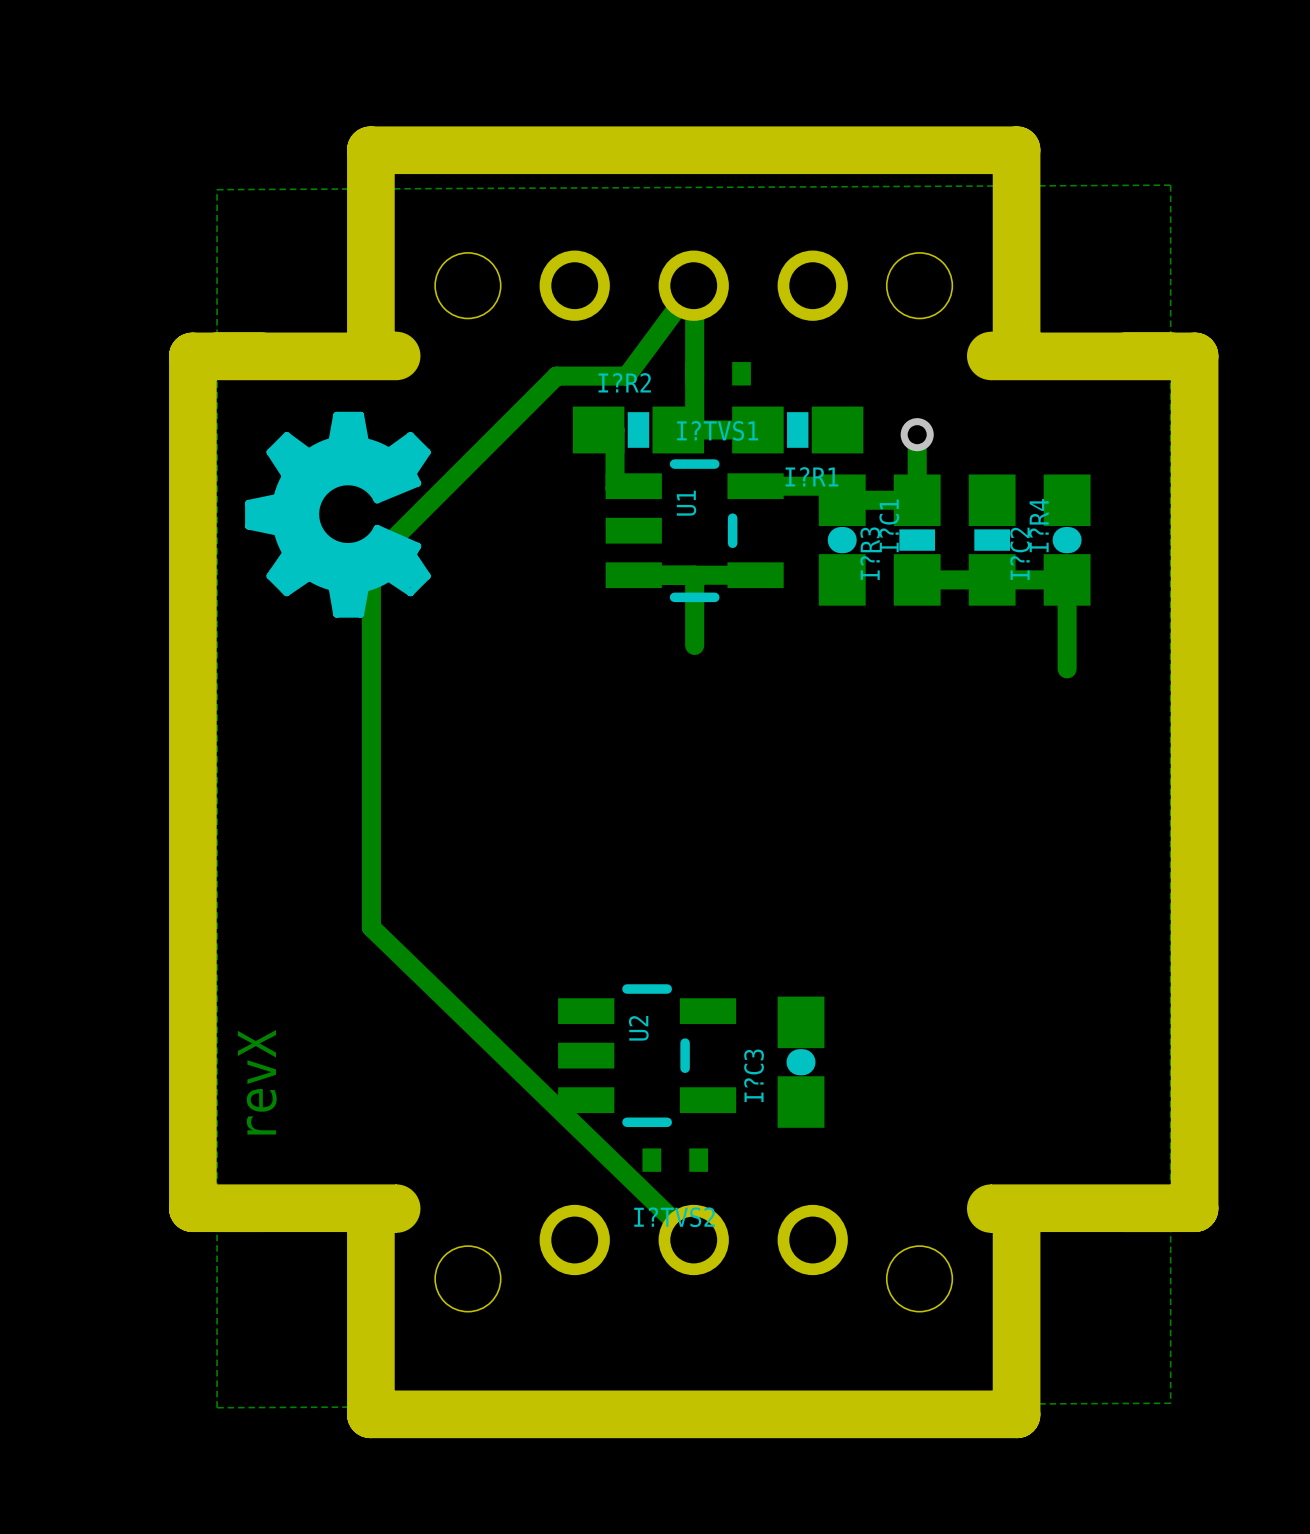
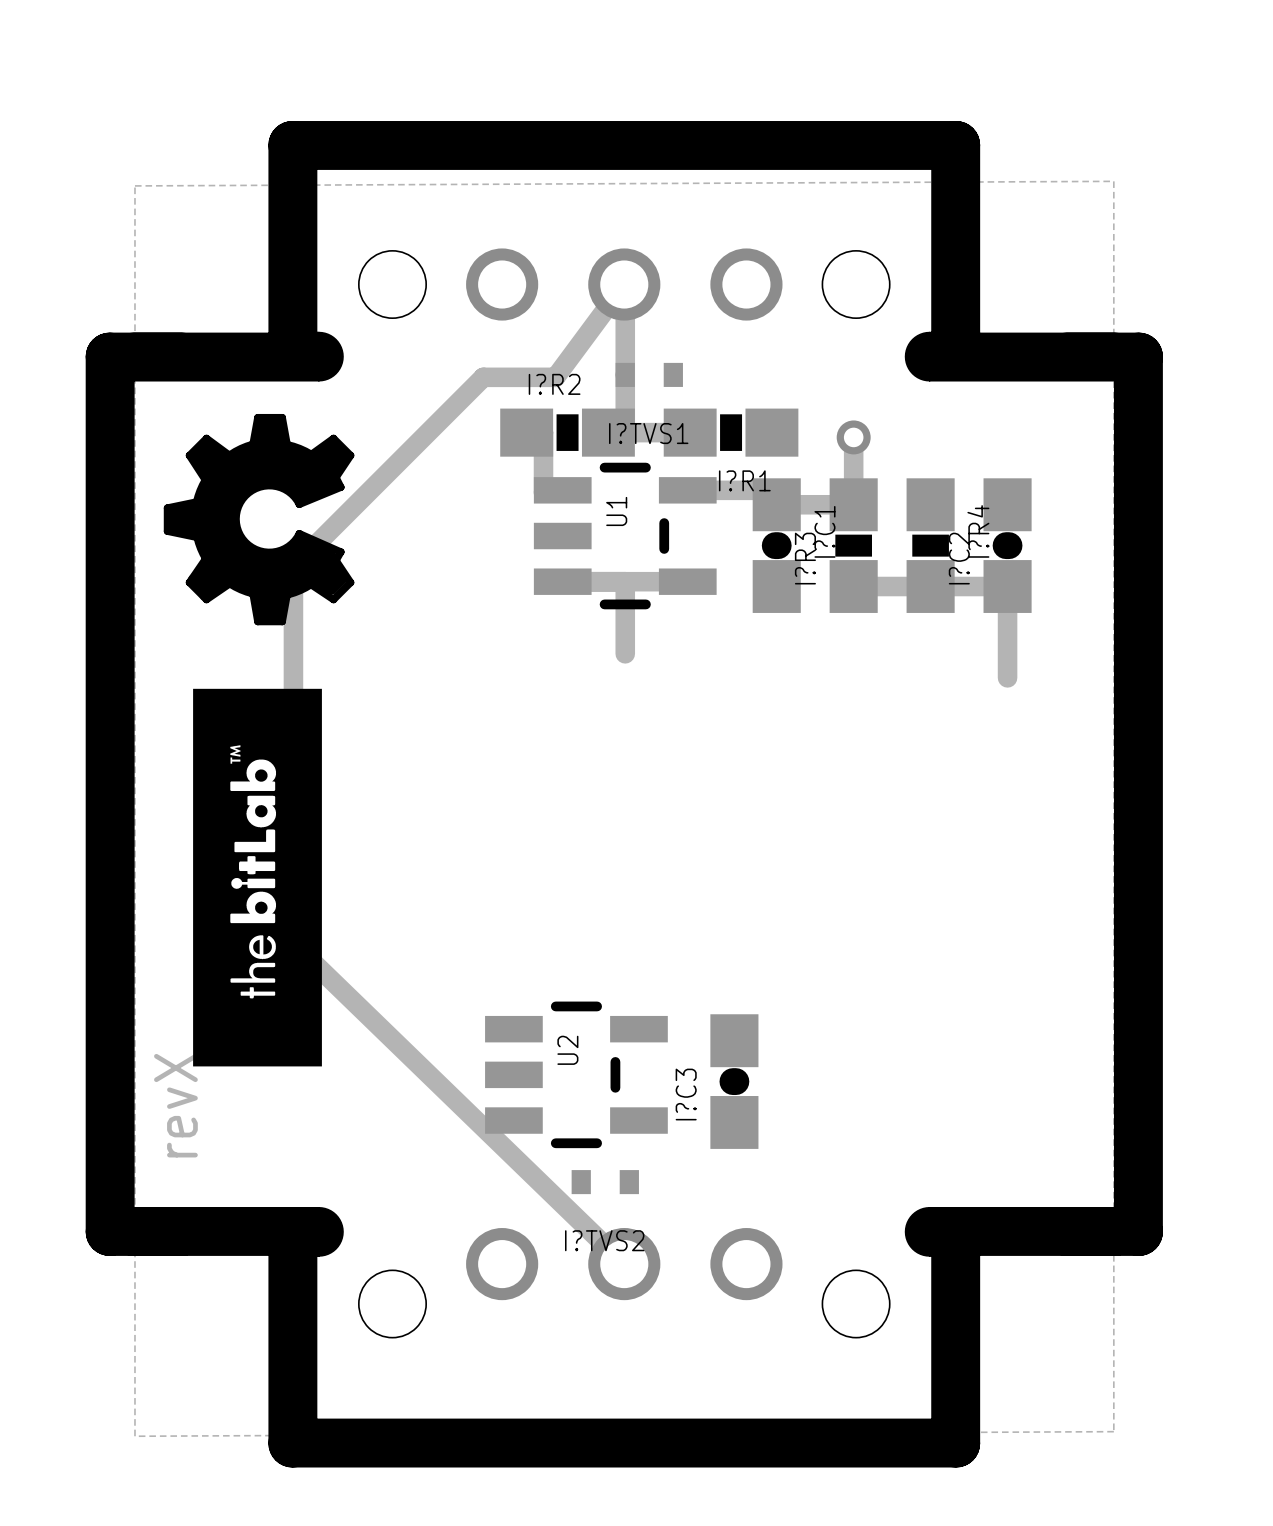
drawing: none -> [193, 688, 322, 1067]

